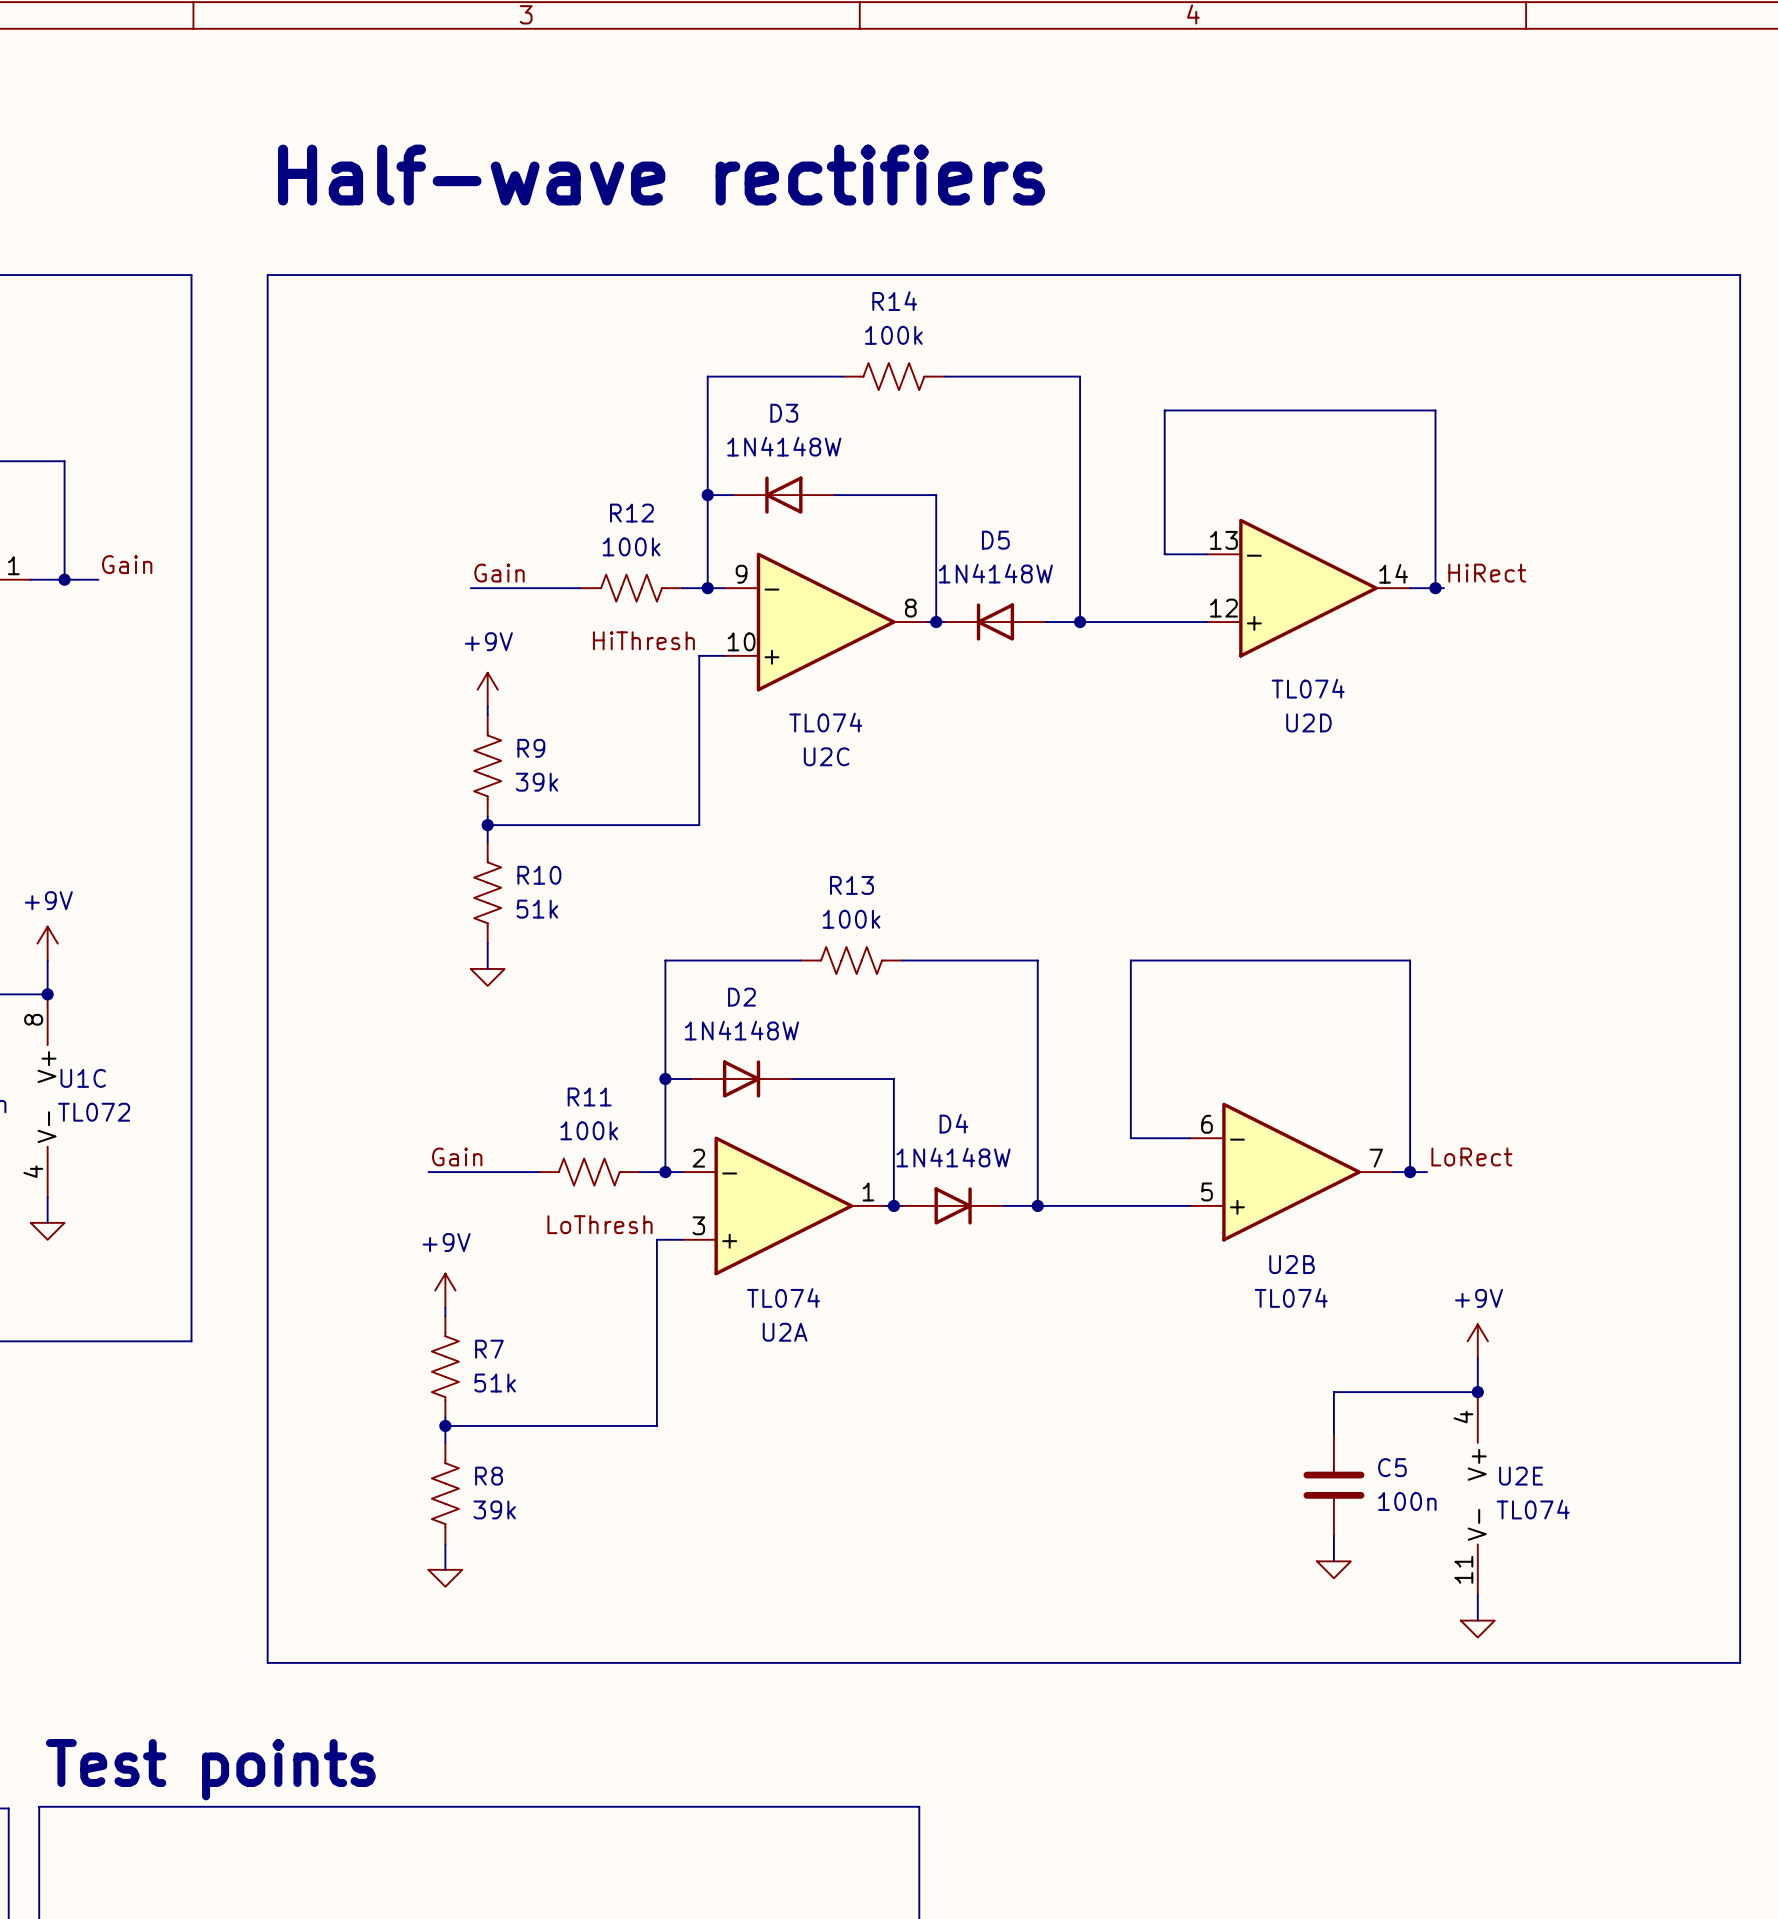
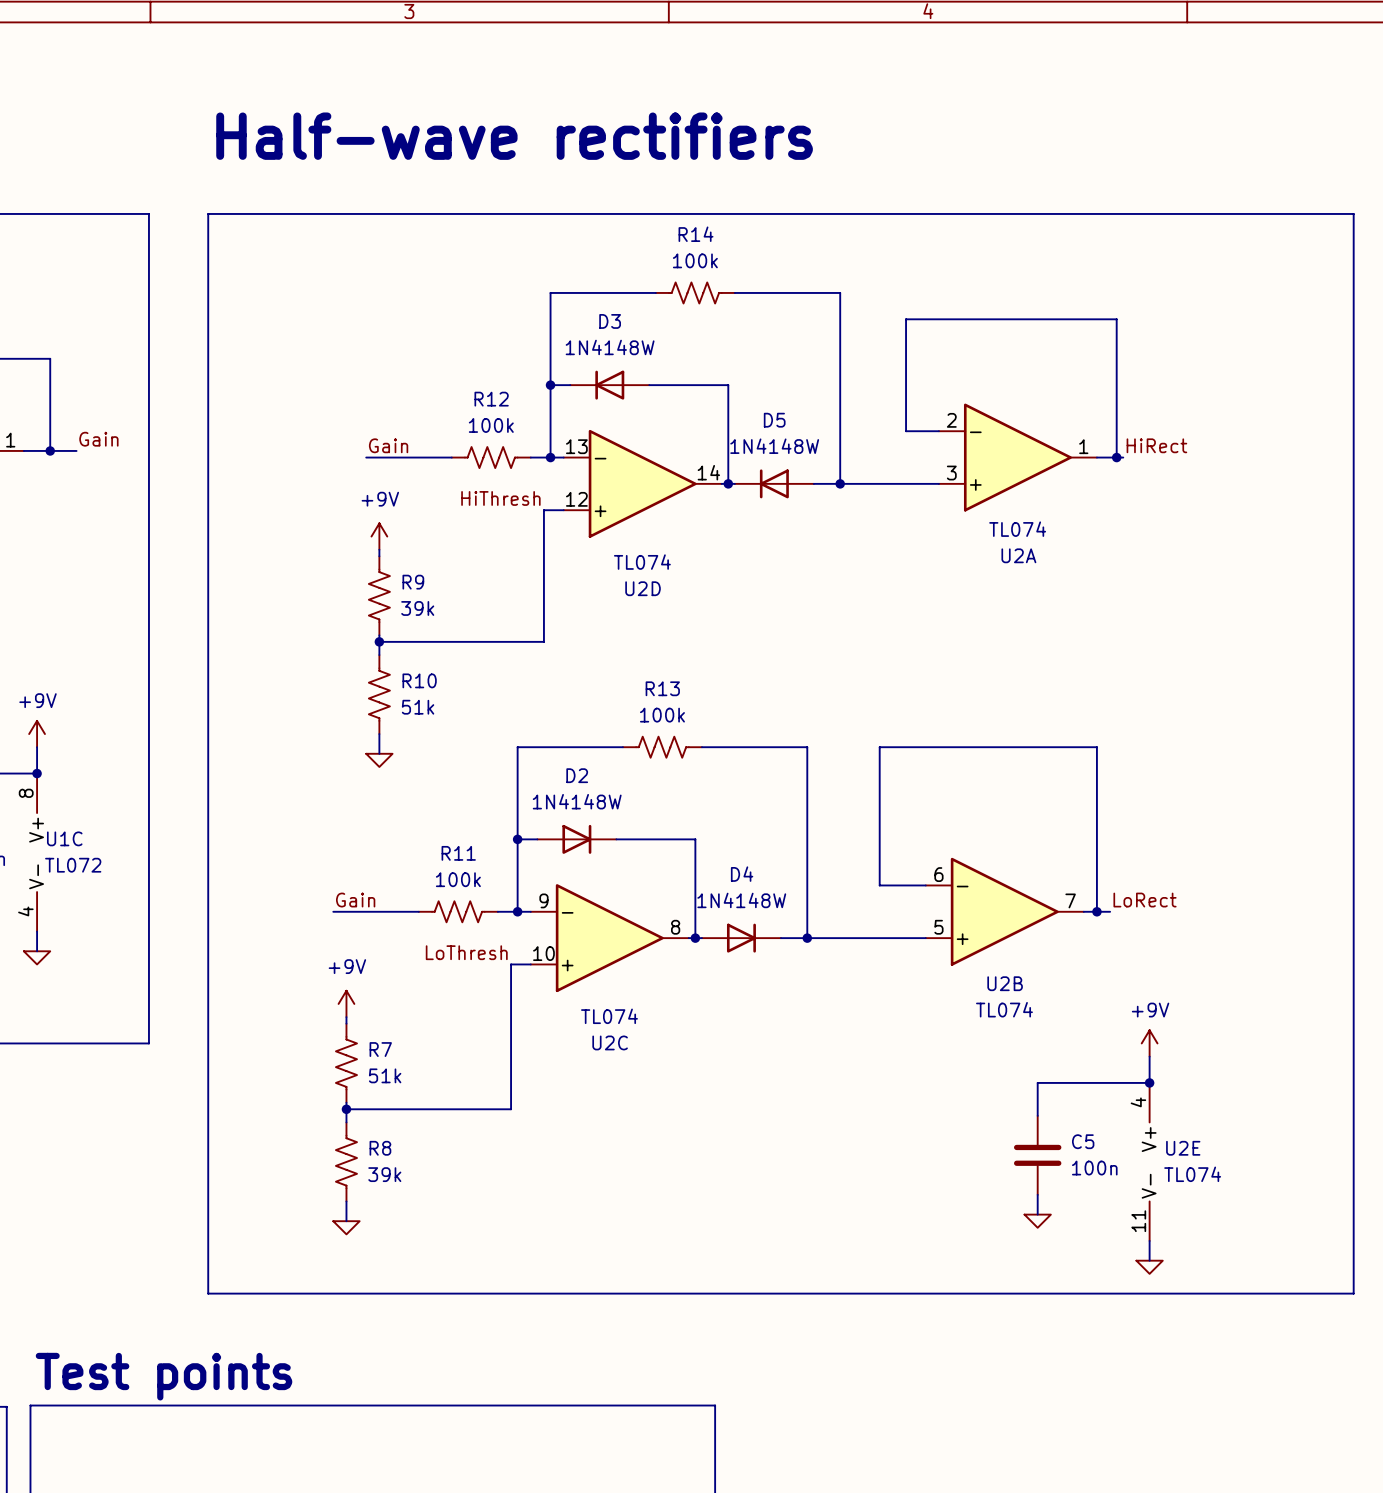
U2D position: (1308, 588) -> (642, 483)
U2C position: (826, 622) -> (609, 938)
U2A position: (783, 1205) -> (1017, 457)

